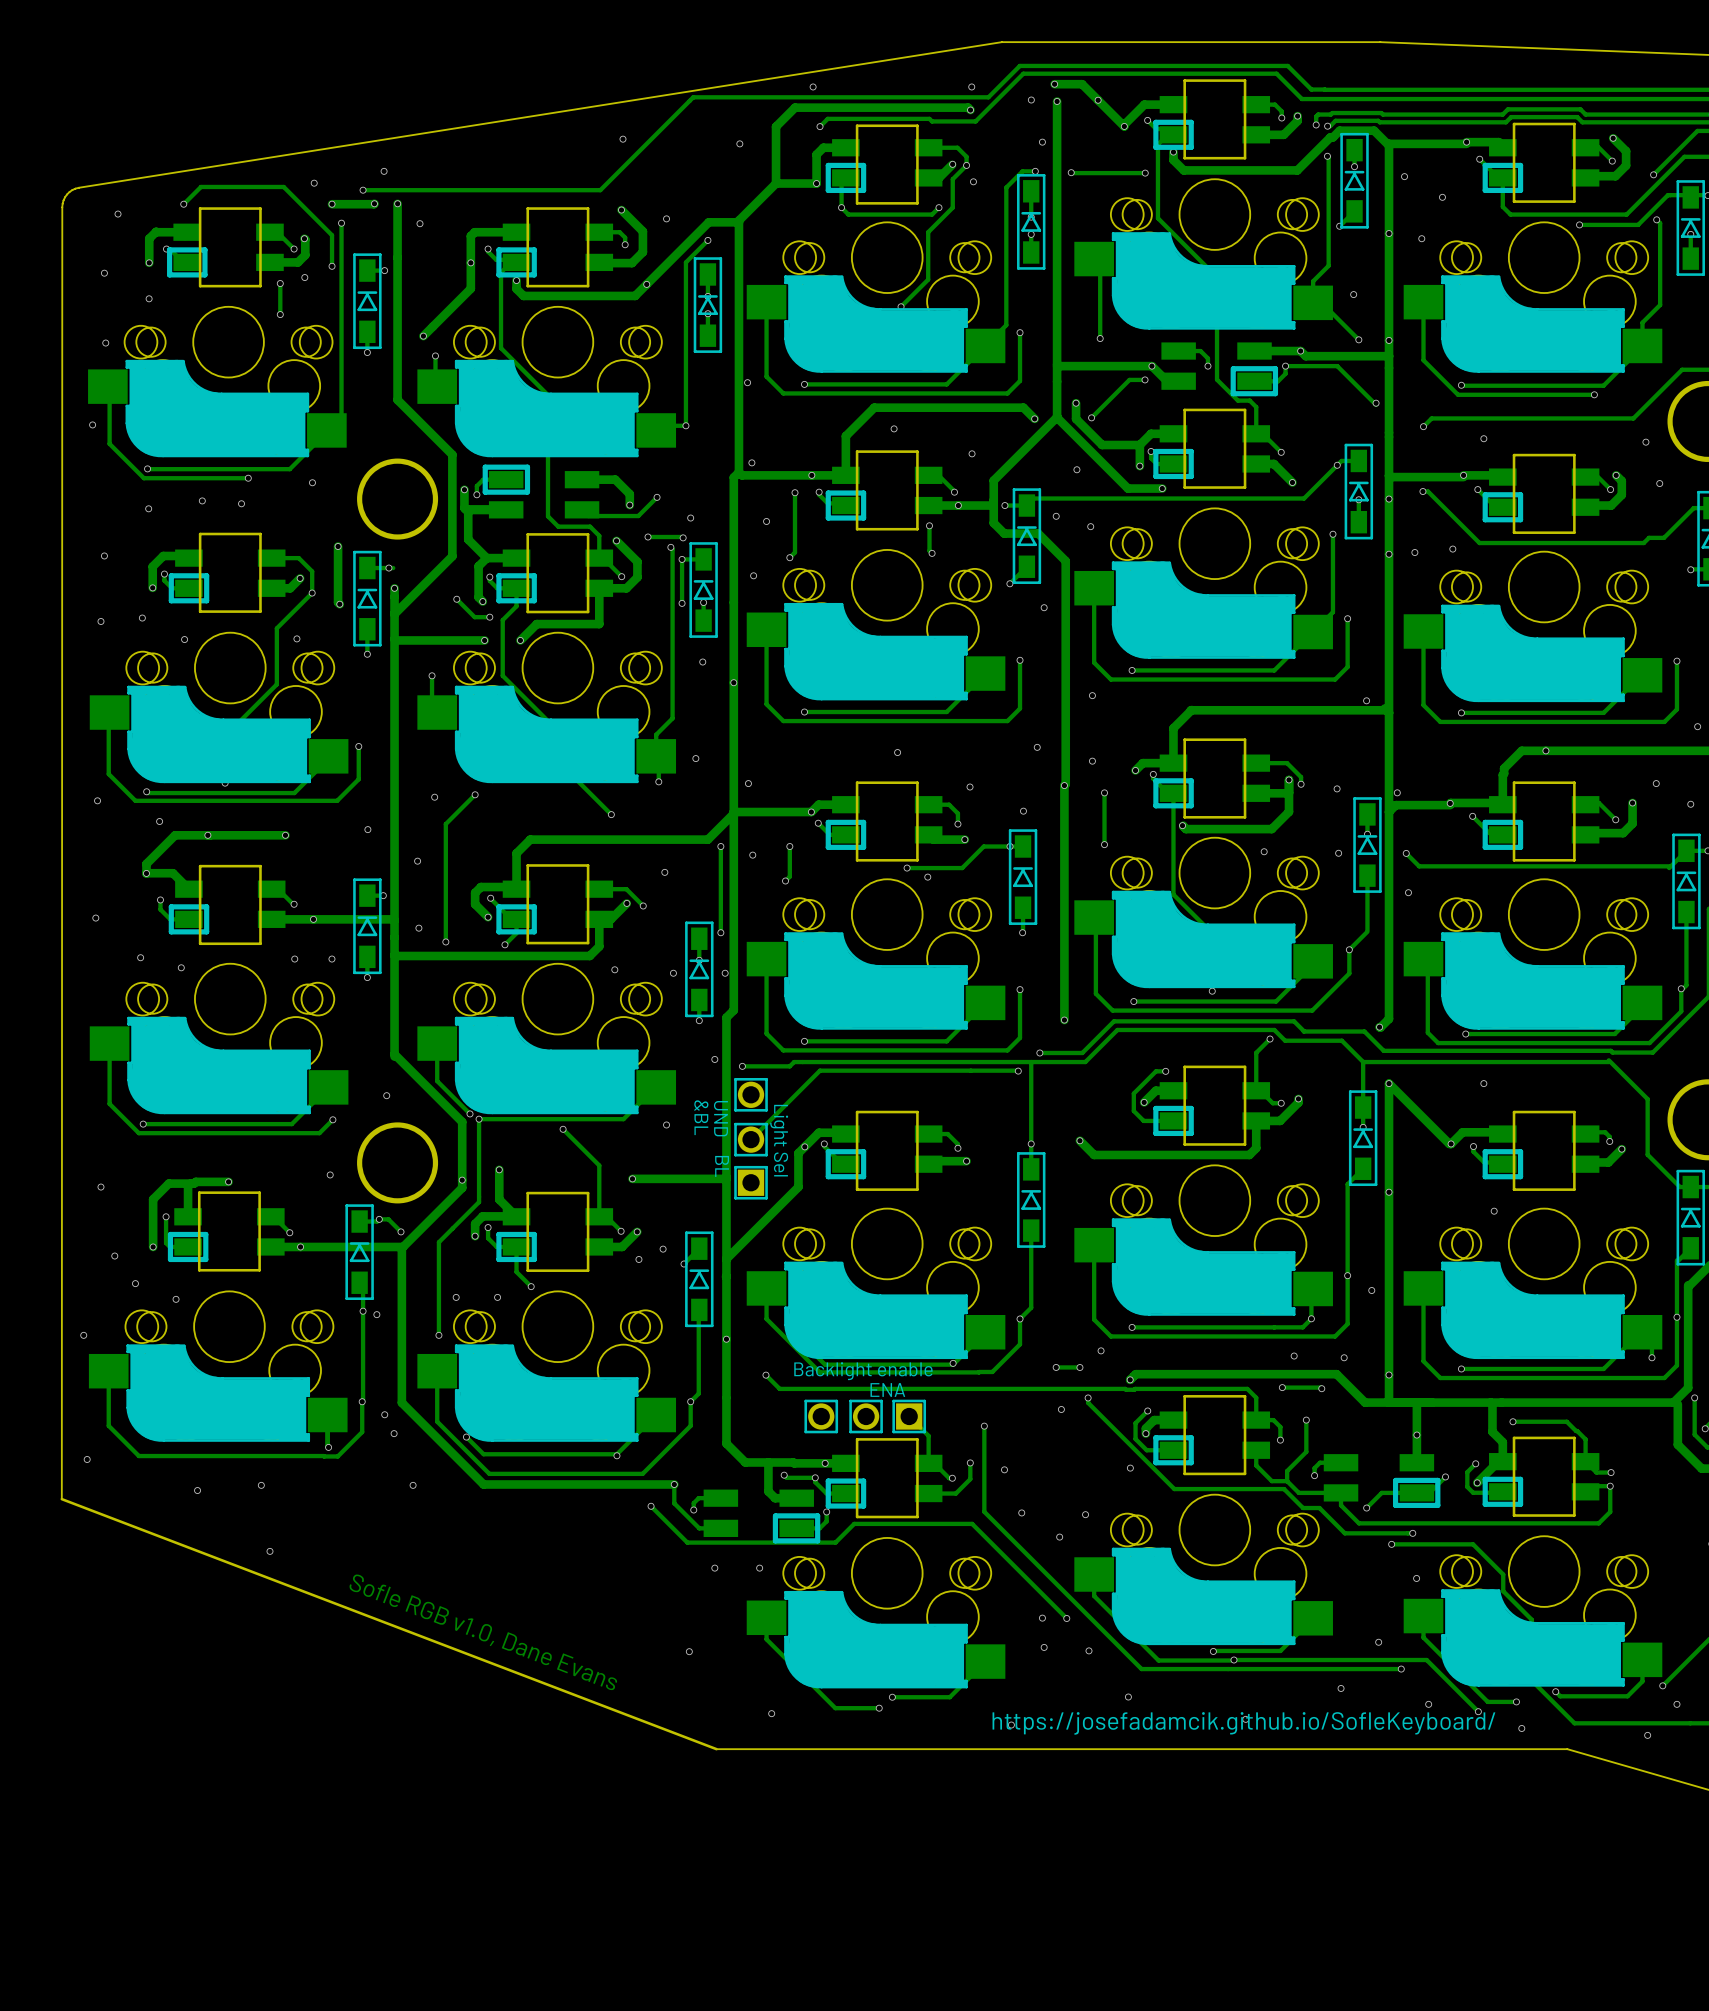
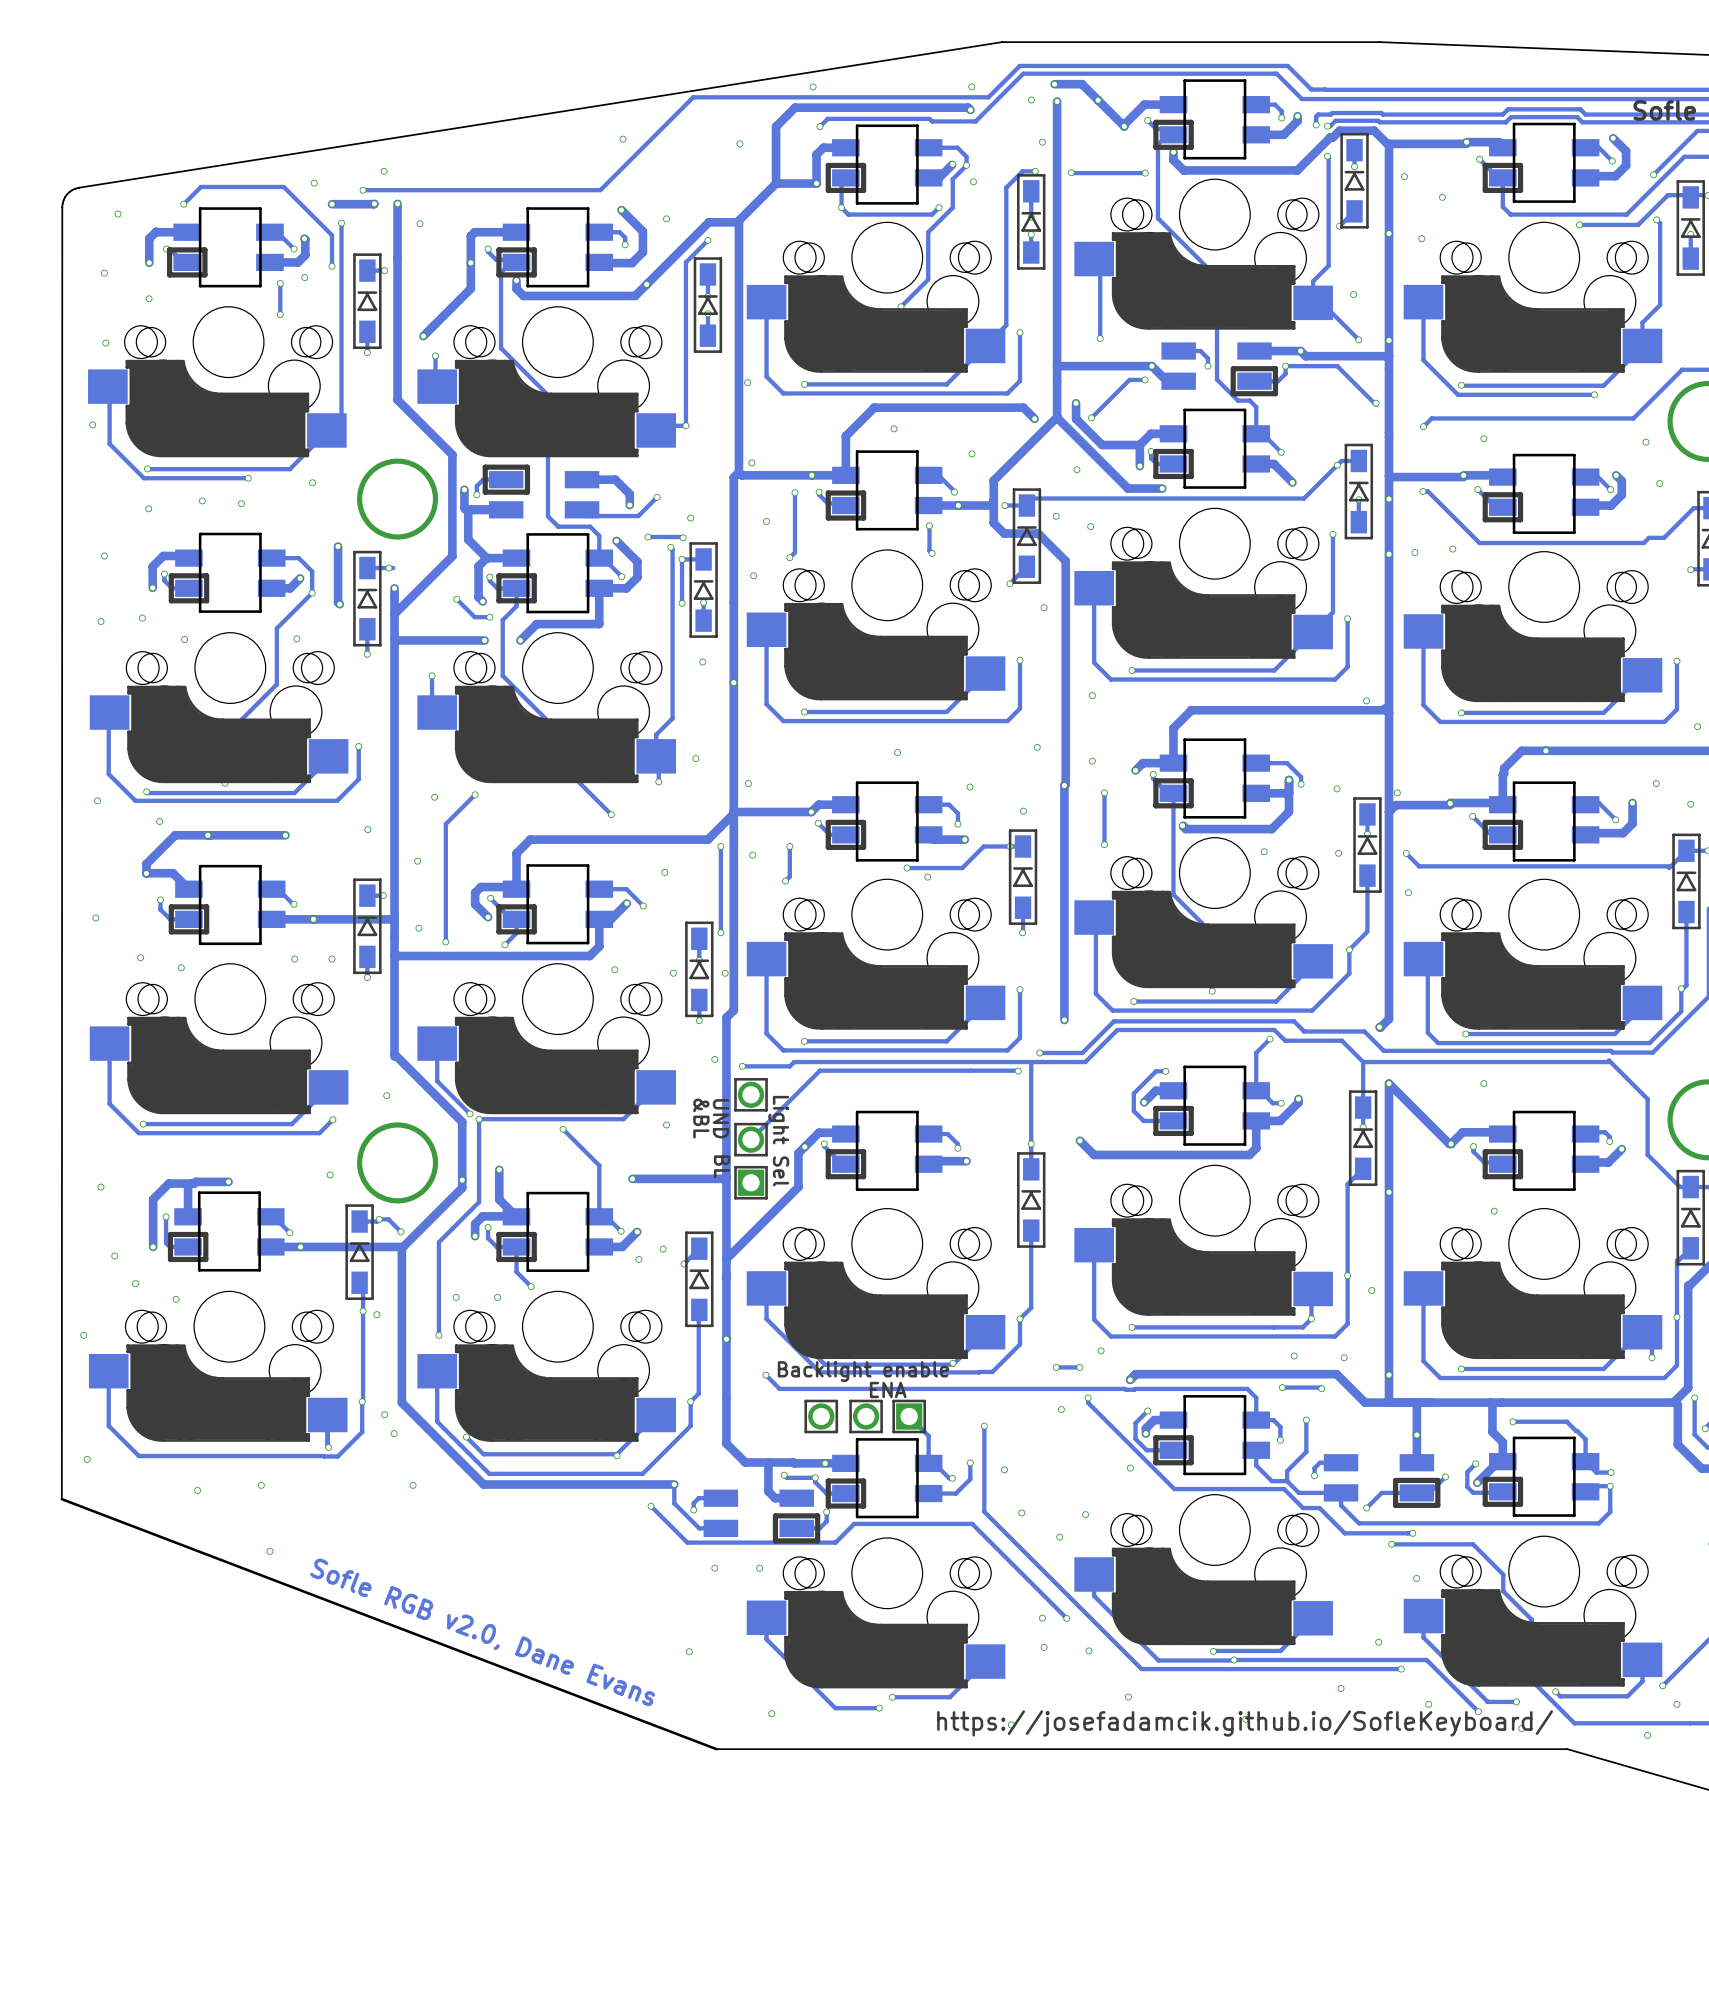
text: Sofle RGB v1.0, Dane Evans (483, 1632) -> Sofle RGB v2.0, Dane Evans (482, 1632)

